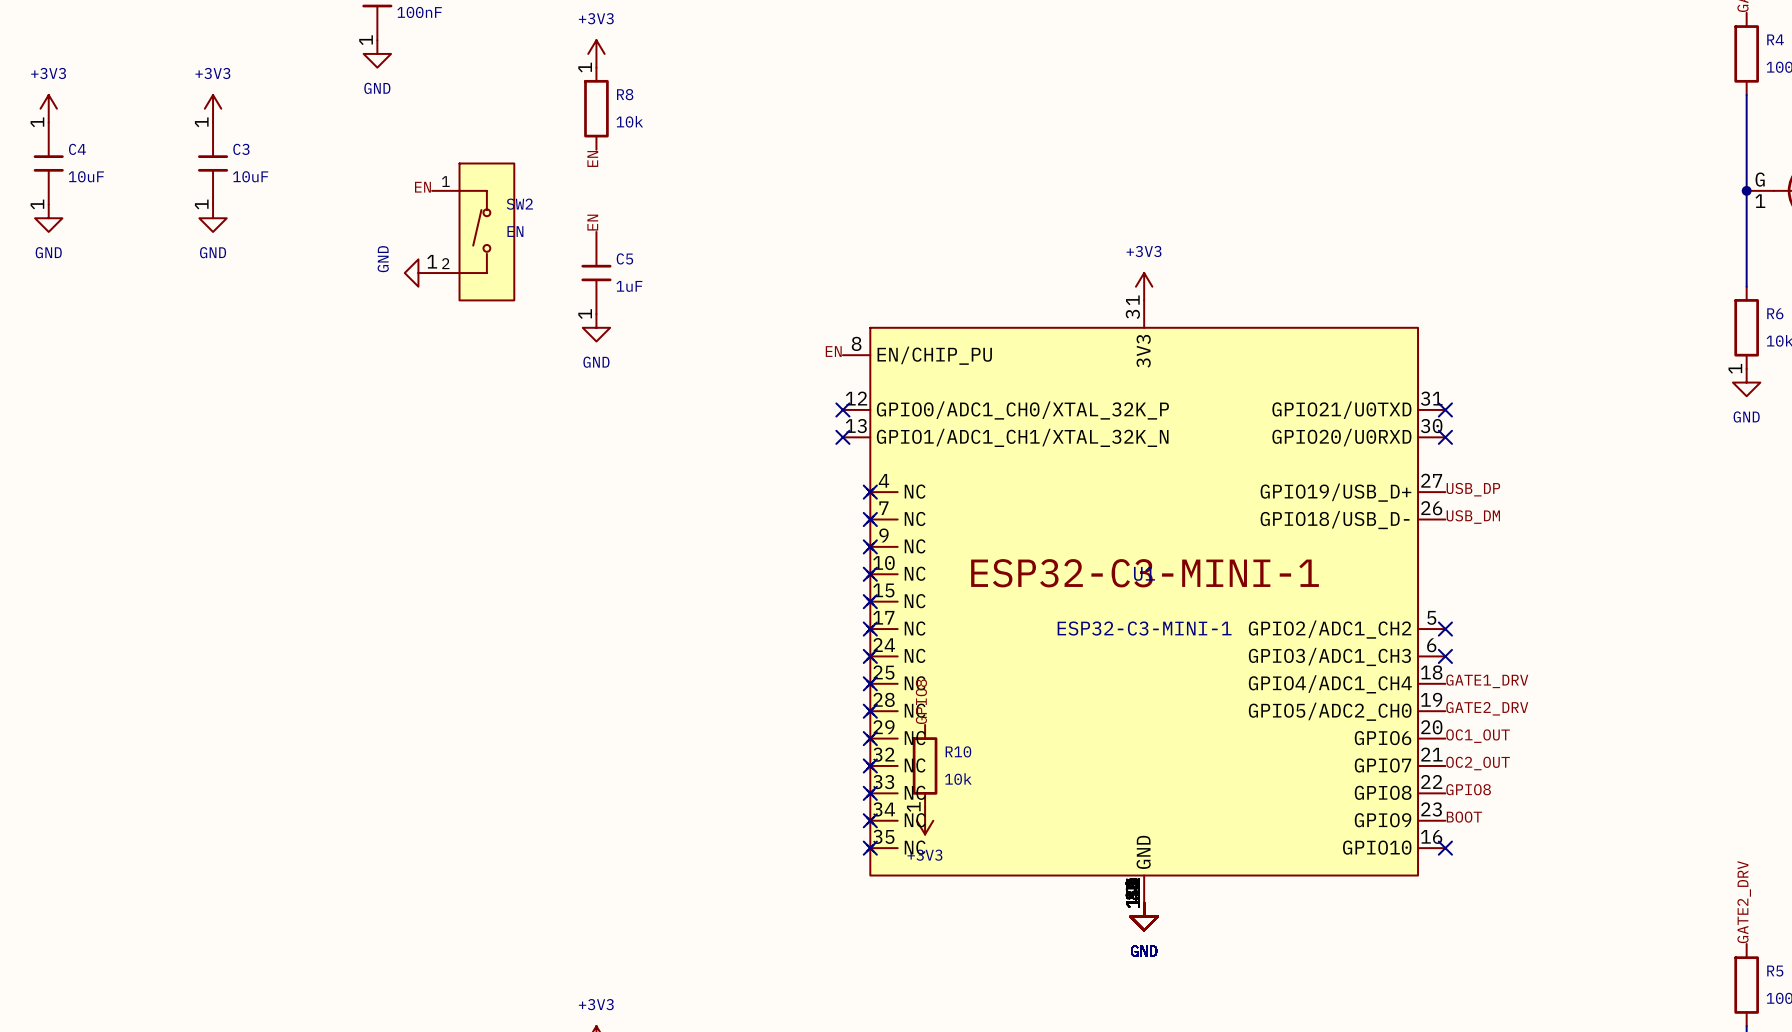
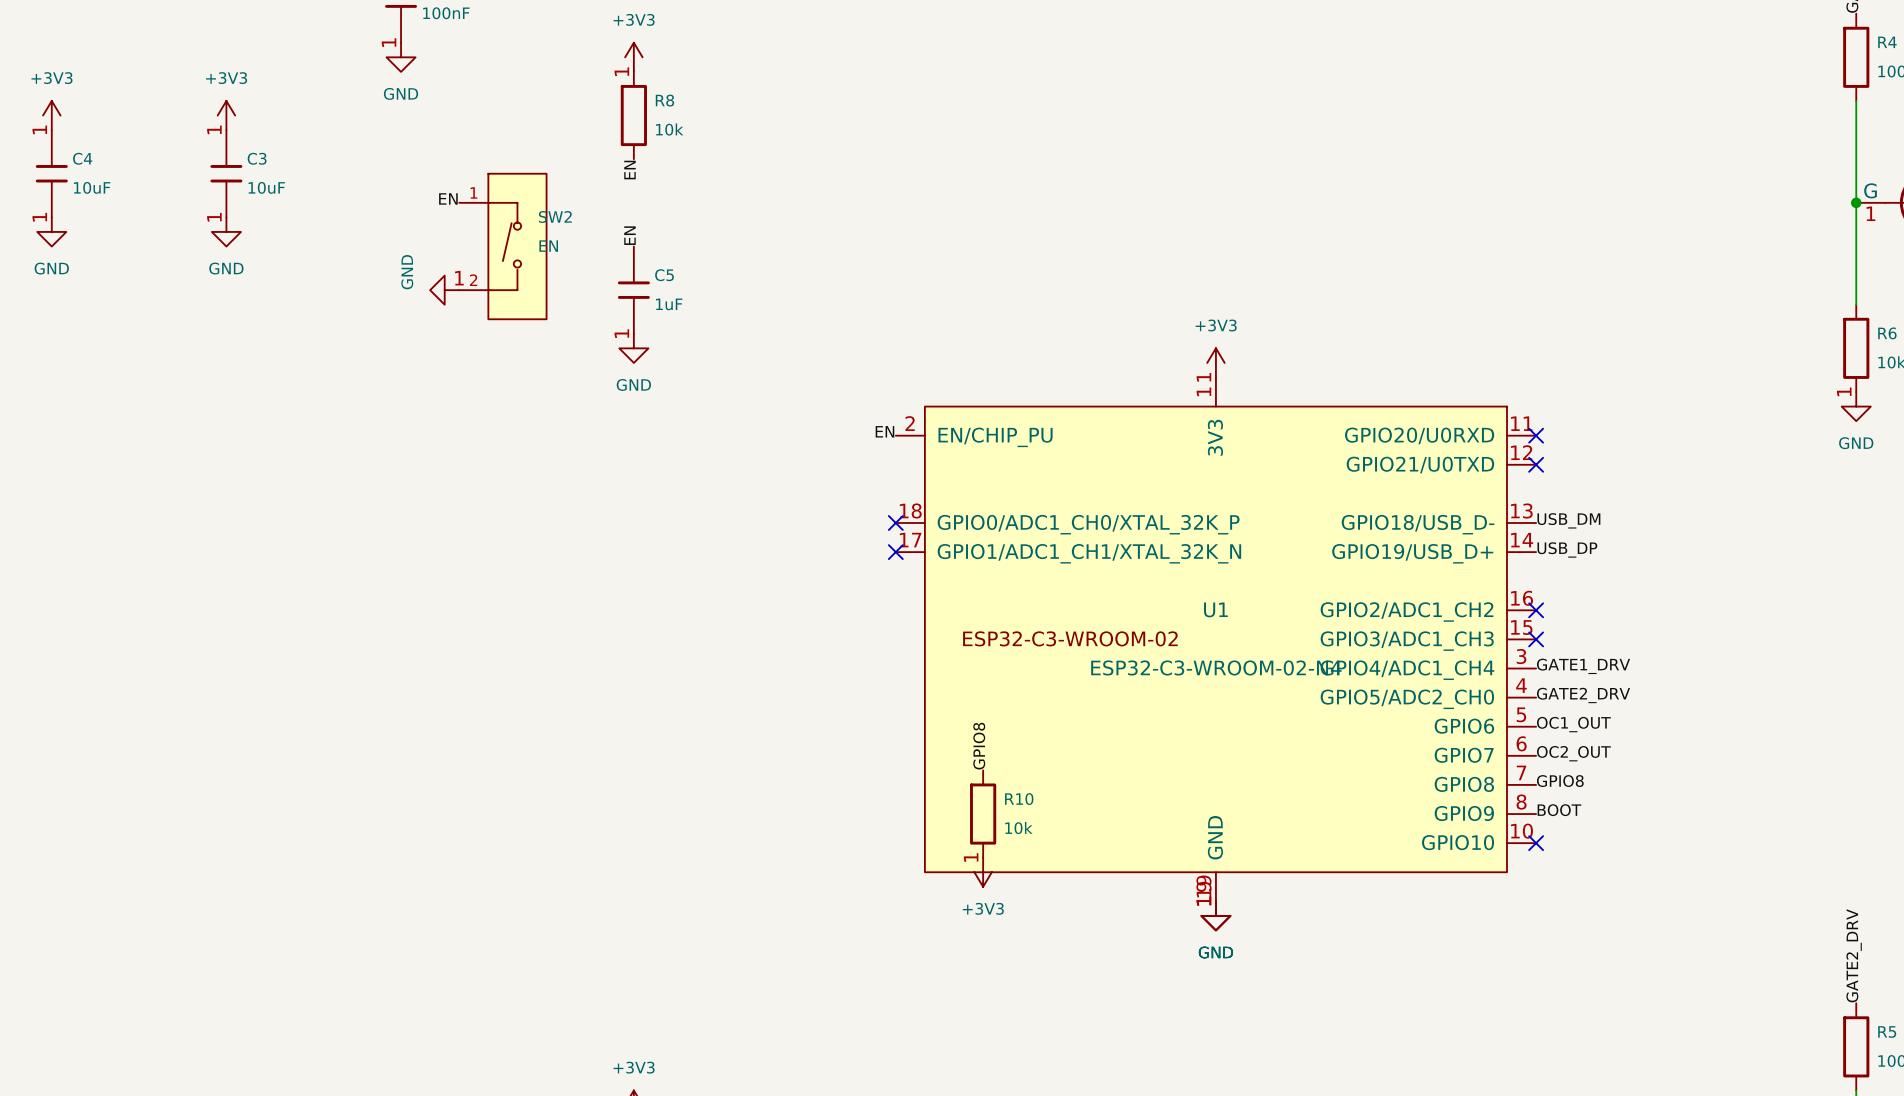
power symbol position: +3V3 (1144, 286) -> +3V3 (1215, 362)
U1 symbol: [842, 300, 1446, 903] -> [895, 377, 1537, 902]
label position: EN (833, 351) -> EN (884, 431)
no-connect mark: (842, 409) -> none
no-connect mark: (842, 437) -> none
label: USB_DP (1473, 489) -> USB_DM (1568, 520)
no-connect mark: none -> (895, 522)
no-connect mark: (870, 492) -> none
label: USB_DM (1473, 517) -> USB_DP (1567, 549)
no-connect mark: none -> (895, 552)
no-connect mark: (870, 519) -> none
no-connect mark: (870, 546) -> none
no-connect mark: (870, 574) -> none
no-connect mark: none -> (1536, 610)
no-connect mark: (870, 601) -> none
no-connect mark: none -> (1536, 639)
label: none -> GATE1_DRV (1583, 666)
U1 value: ESP32-C3-MINI-1 (1144, 628) -> ESP32-C3-WROOM-02-N4 (1216, 667)
no-connect mark: (870, 629) -> none
no-connect mark: (1445, 629) -> none
label: none -> GATE2_DRV (1583, 695)
no-connect mark: (870, 656) -> none
no-connect mark: (1445, 656) -> none
label: GATE1_DRV (1487, 681) -> OC1_OUT (1573, 724)
no-connect mark: (870, 683) -> none
label: GATE2_DRV (1487, 708) -> OC2_OUT (1573, 753)
no-connect mark: (870, 711) -> none
label: OC1_OUT (1478, 736) -> GPIO8 (1560, 781)
no-connect mark: (870, 738) -> none
label: OC2_OUT (1478, 763) -> BOOT (1559, 810)
no-connect mark: (870, 765) -> none
label: GPIO8 (1468, 789) -> none
no-connect mark: (870, 793) -> none
label: BOOT (1464, 817) -> none
no-connect mark: (870, 820) -> none
no-connect mark: (870, 848) -> none
no-connect mark position: (1445, 848) -> (1536, 843)
power symbol position: GND (1144, 916) -> GND (1215, 915)

